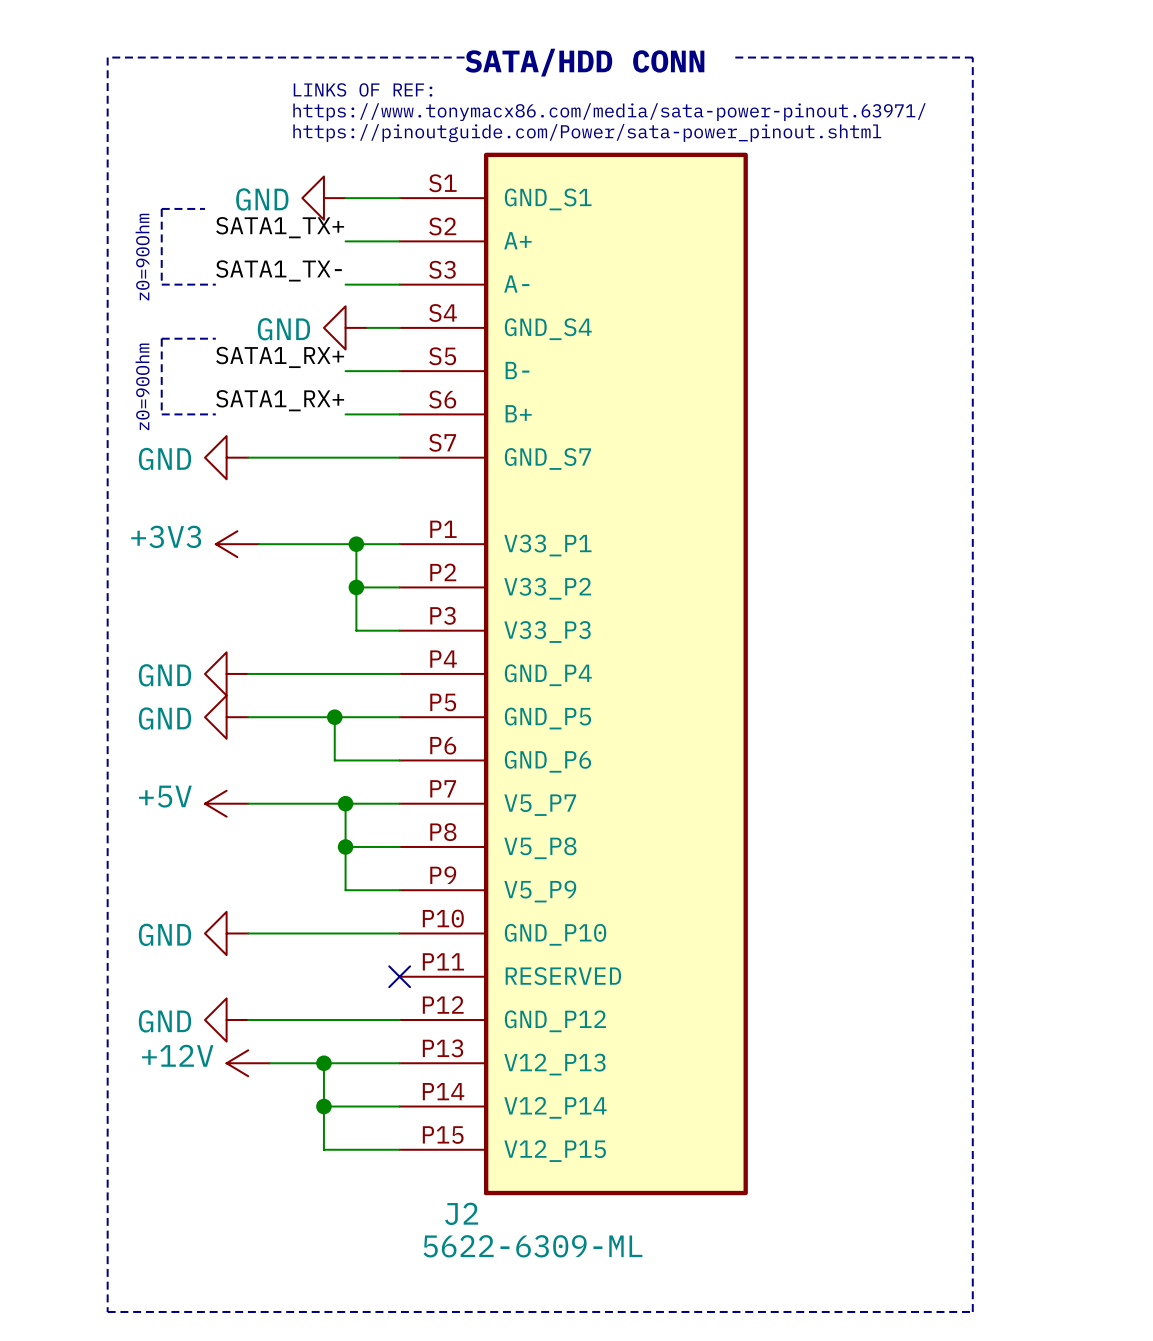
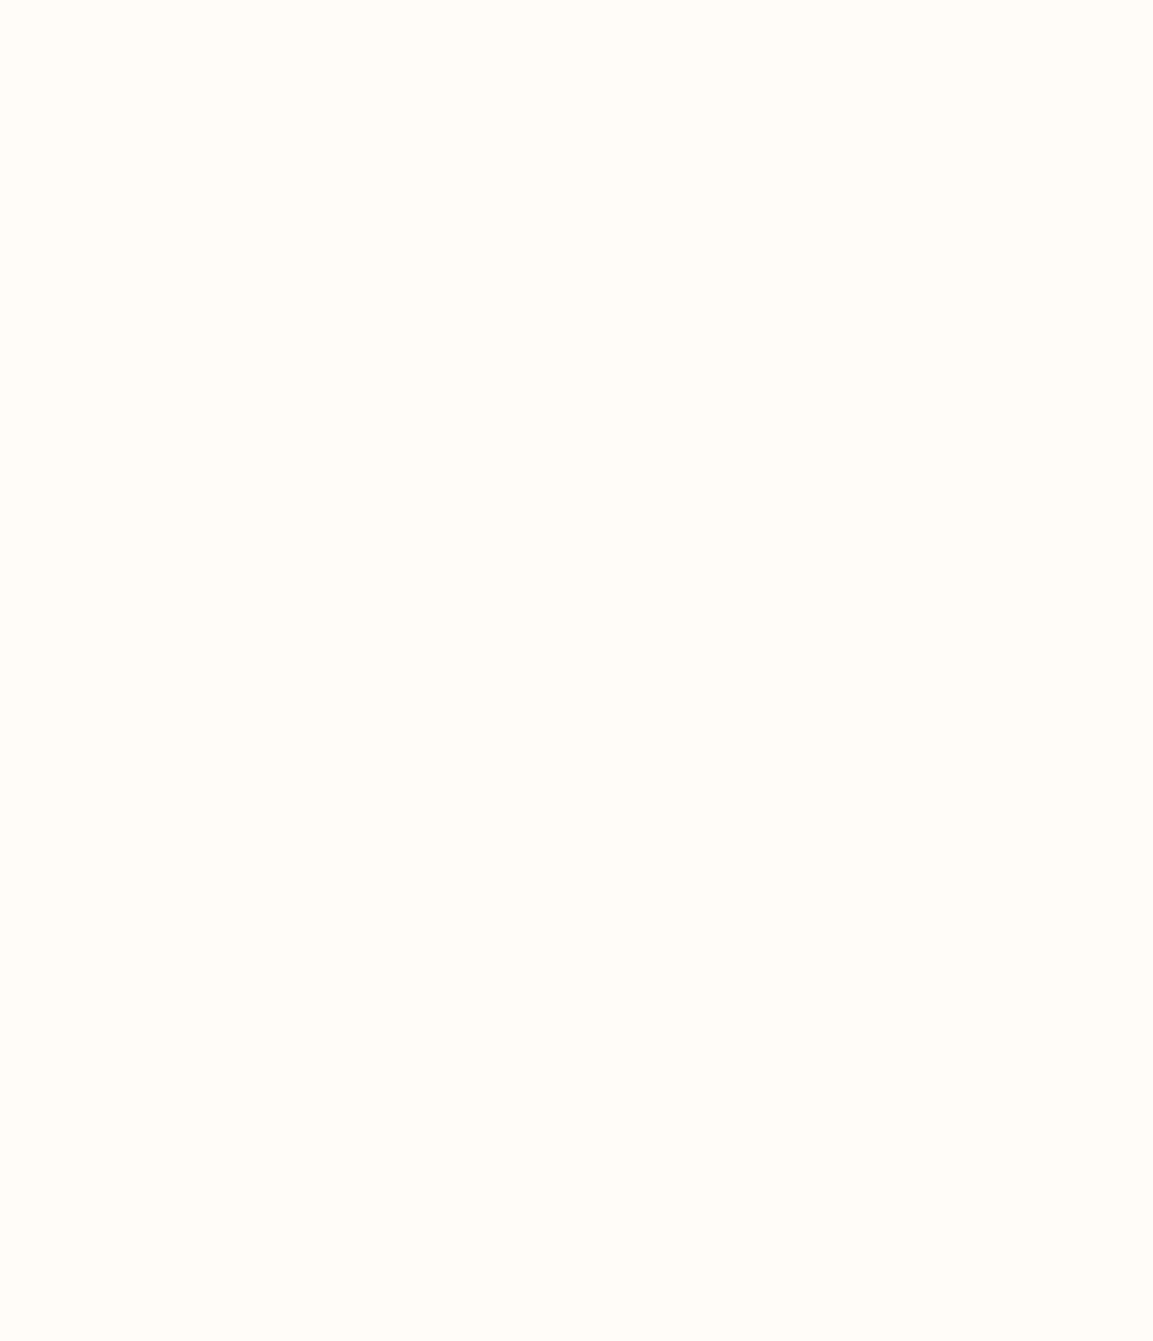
line: (464, 57) (107, 57) (107, 1311) (972, 1311) (972, 57) (734, 57) -> none
text: SATA/HDD CONN (584, 62) -> none
text: LINKS OF REF: (363, 89) -> none
text: https://www.tonymacx86.com/media/sata-power-pinout.63971/ (609, 112) -> none
text: https://pinoutguide.com/Power/sata-power_pinout.shtml (587, 133) -> none
power symbol: GND (323, 198) -> none
wire: (345, 198) (399, 198) -> none
line: (204, 208) (161, 208) (161, 284) (215, 284) -> none
label: SATA1_TX+ (280, 227) -> none
wire: (345, 241) (399, 241) -> none
text: z0=90Ohm (142, 257) -> none
label: SATA1_TX- (278, 270) -> none
wire: (345, 284) (399, 284) -> none
power symbol: GND (345, 327) -> none
wire: (367, 327) (399, 327) -> none
line: (215, 338) (161, 338) (161, 414) (215, 414) -> none
label: SATA1_RX+ (280, 357) -> none
wire: (345, 371) (399, 371) -> none
text: z0=90Ohm (142, 386) -> none
label: SATA1_RX+ (280, 400) -> none
wire: (345, 414) (399, 414) -> none
power symbol: GND (226, 457) -> none
wire: (248, 457) (399, 457) -> none
power symbol: +3V3 (237, 544) -> none
wire: (259, 544) (399, 544) -> none
wire: (356, 544) (356, 630) (399, 630) -> none
junction: (356, 544) -> none
wire: (356, 587) (399, 587) -> none
junction: (356, 587) -> none
power symbol: GND (226, 673) -> none
wire: (248, 673) (399, 673) -> none
J2: 5622-6309-ML (573, 673) -> none
power symbol: GND (226, 717) -> none
wire: (248, 717) (399, 717) -> none
wire: (334, 717) (334, 760) (399, 760) -> none
junction: (334, 717) -> none
power symbol: +5V (226, 803) -> none
wire: (248, 803) (399, 803) -> none
wire: (345, 803) (345, 890) (399, 890) -> none
junction: (345, 803) -> none
wire: (345, 846) (399, 846) -> none
junction: (345, 846) -> none
power symbol: GND (226, 933) -> none
wire: (248, 933) (399, 933) -> none
no-connect mark: (399, 976) -> none
power symbol: GND (226, 1020) -> none
wire: (248, 1020) (399, 1020) -> none
power symbol: +12V (248, 1063) -> none
wire: (269, 1063) (399, 1063) -> none
wire: (323, 1063) (323, 1149) (399, 1149) -> none
junction: (323, 1063) -> none
wire: (323, 1106) (399, 1106) -> none
junction: (323, 1106) -> none

